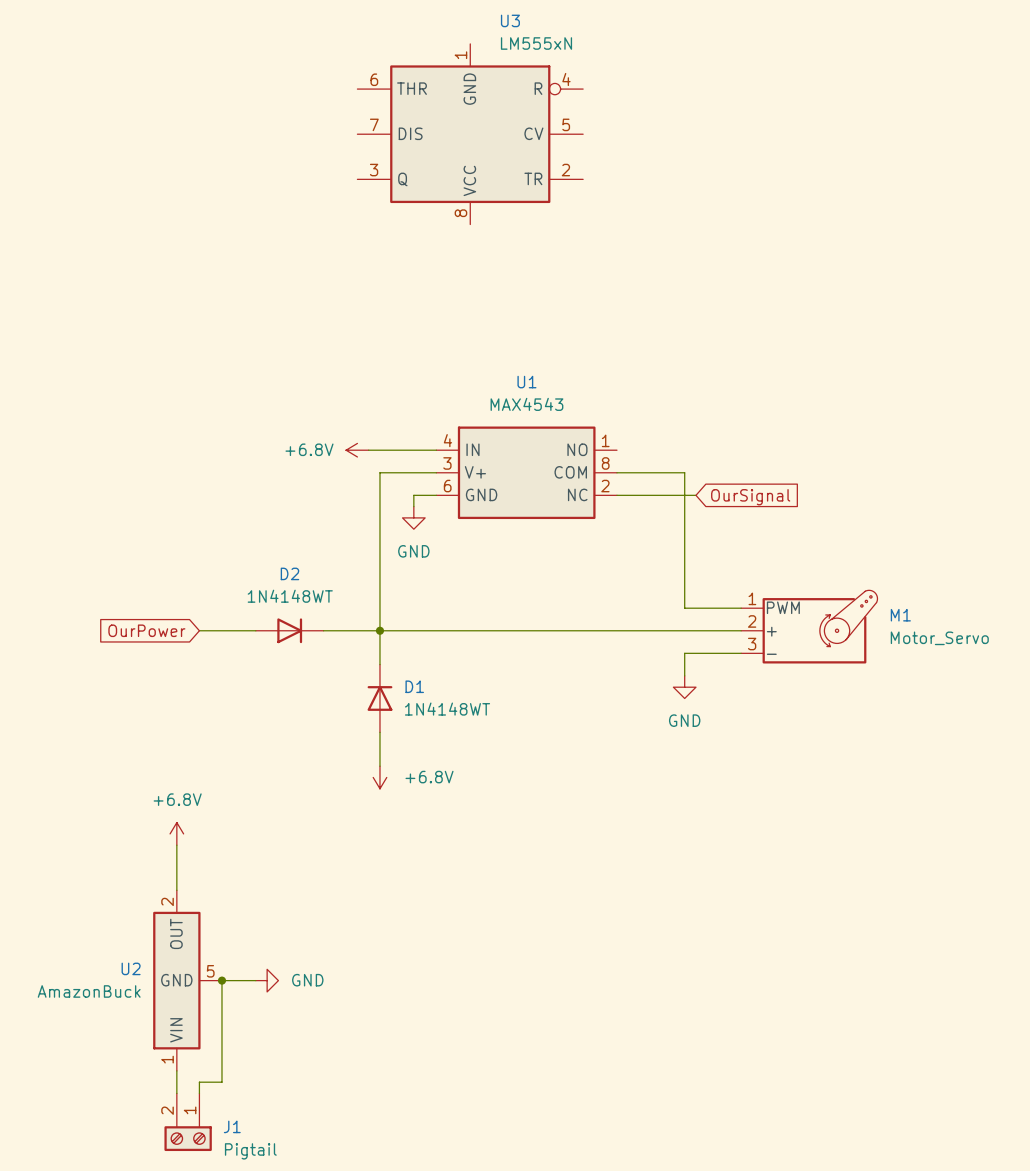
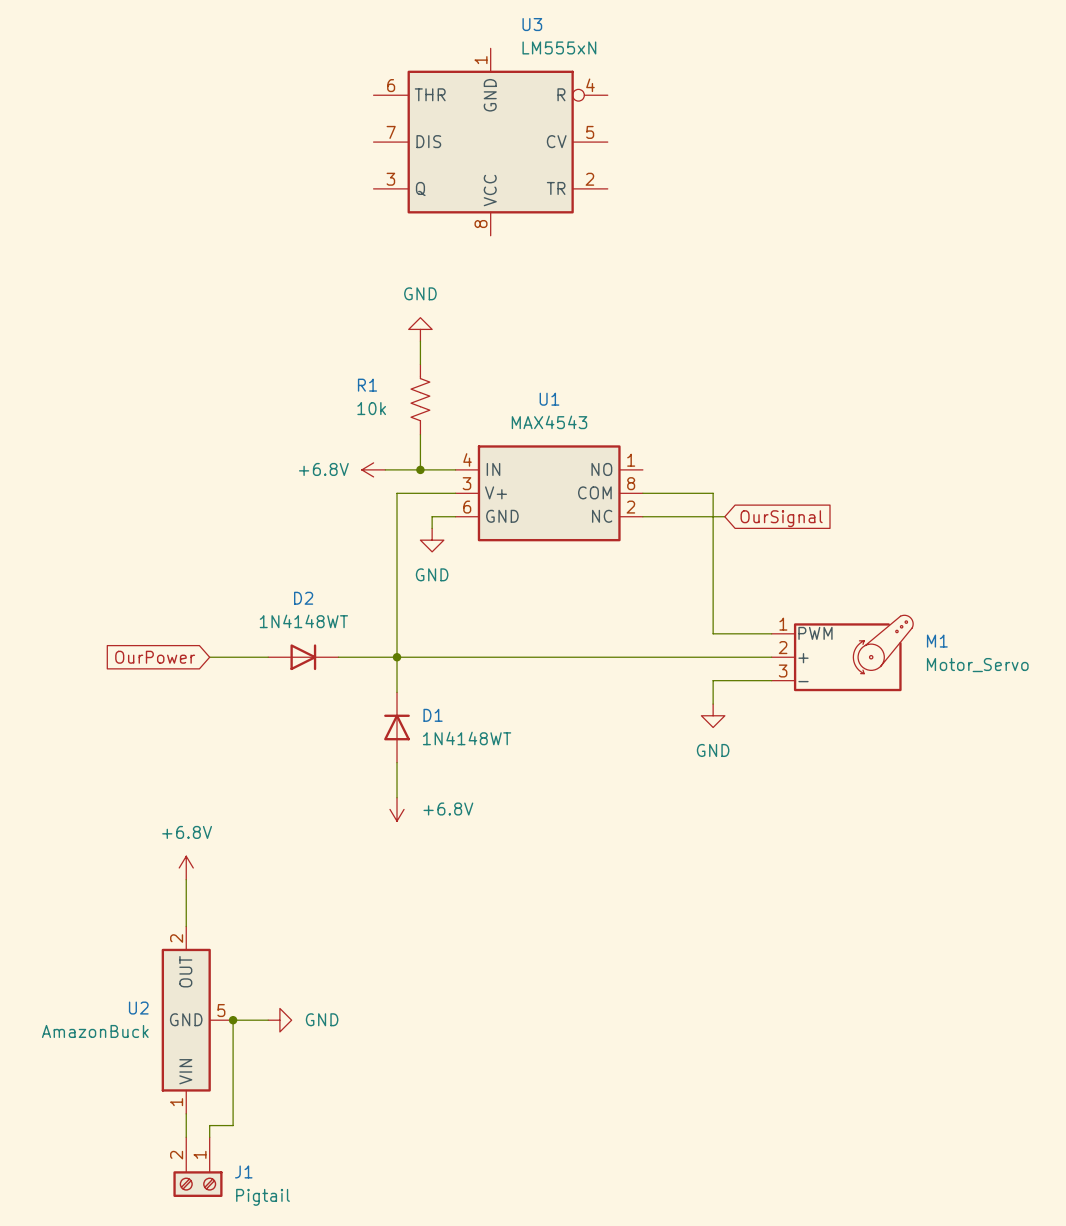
power symbol: none -> GND (420, 329)
wire: none -> (420, 341) (420, 364)
R1: none -> 10k (420, 399)
wire: none -> (420, 434) (420, 469)
junction: none -> (420, 469)

